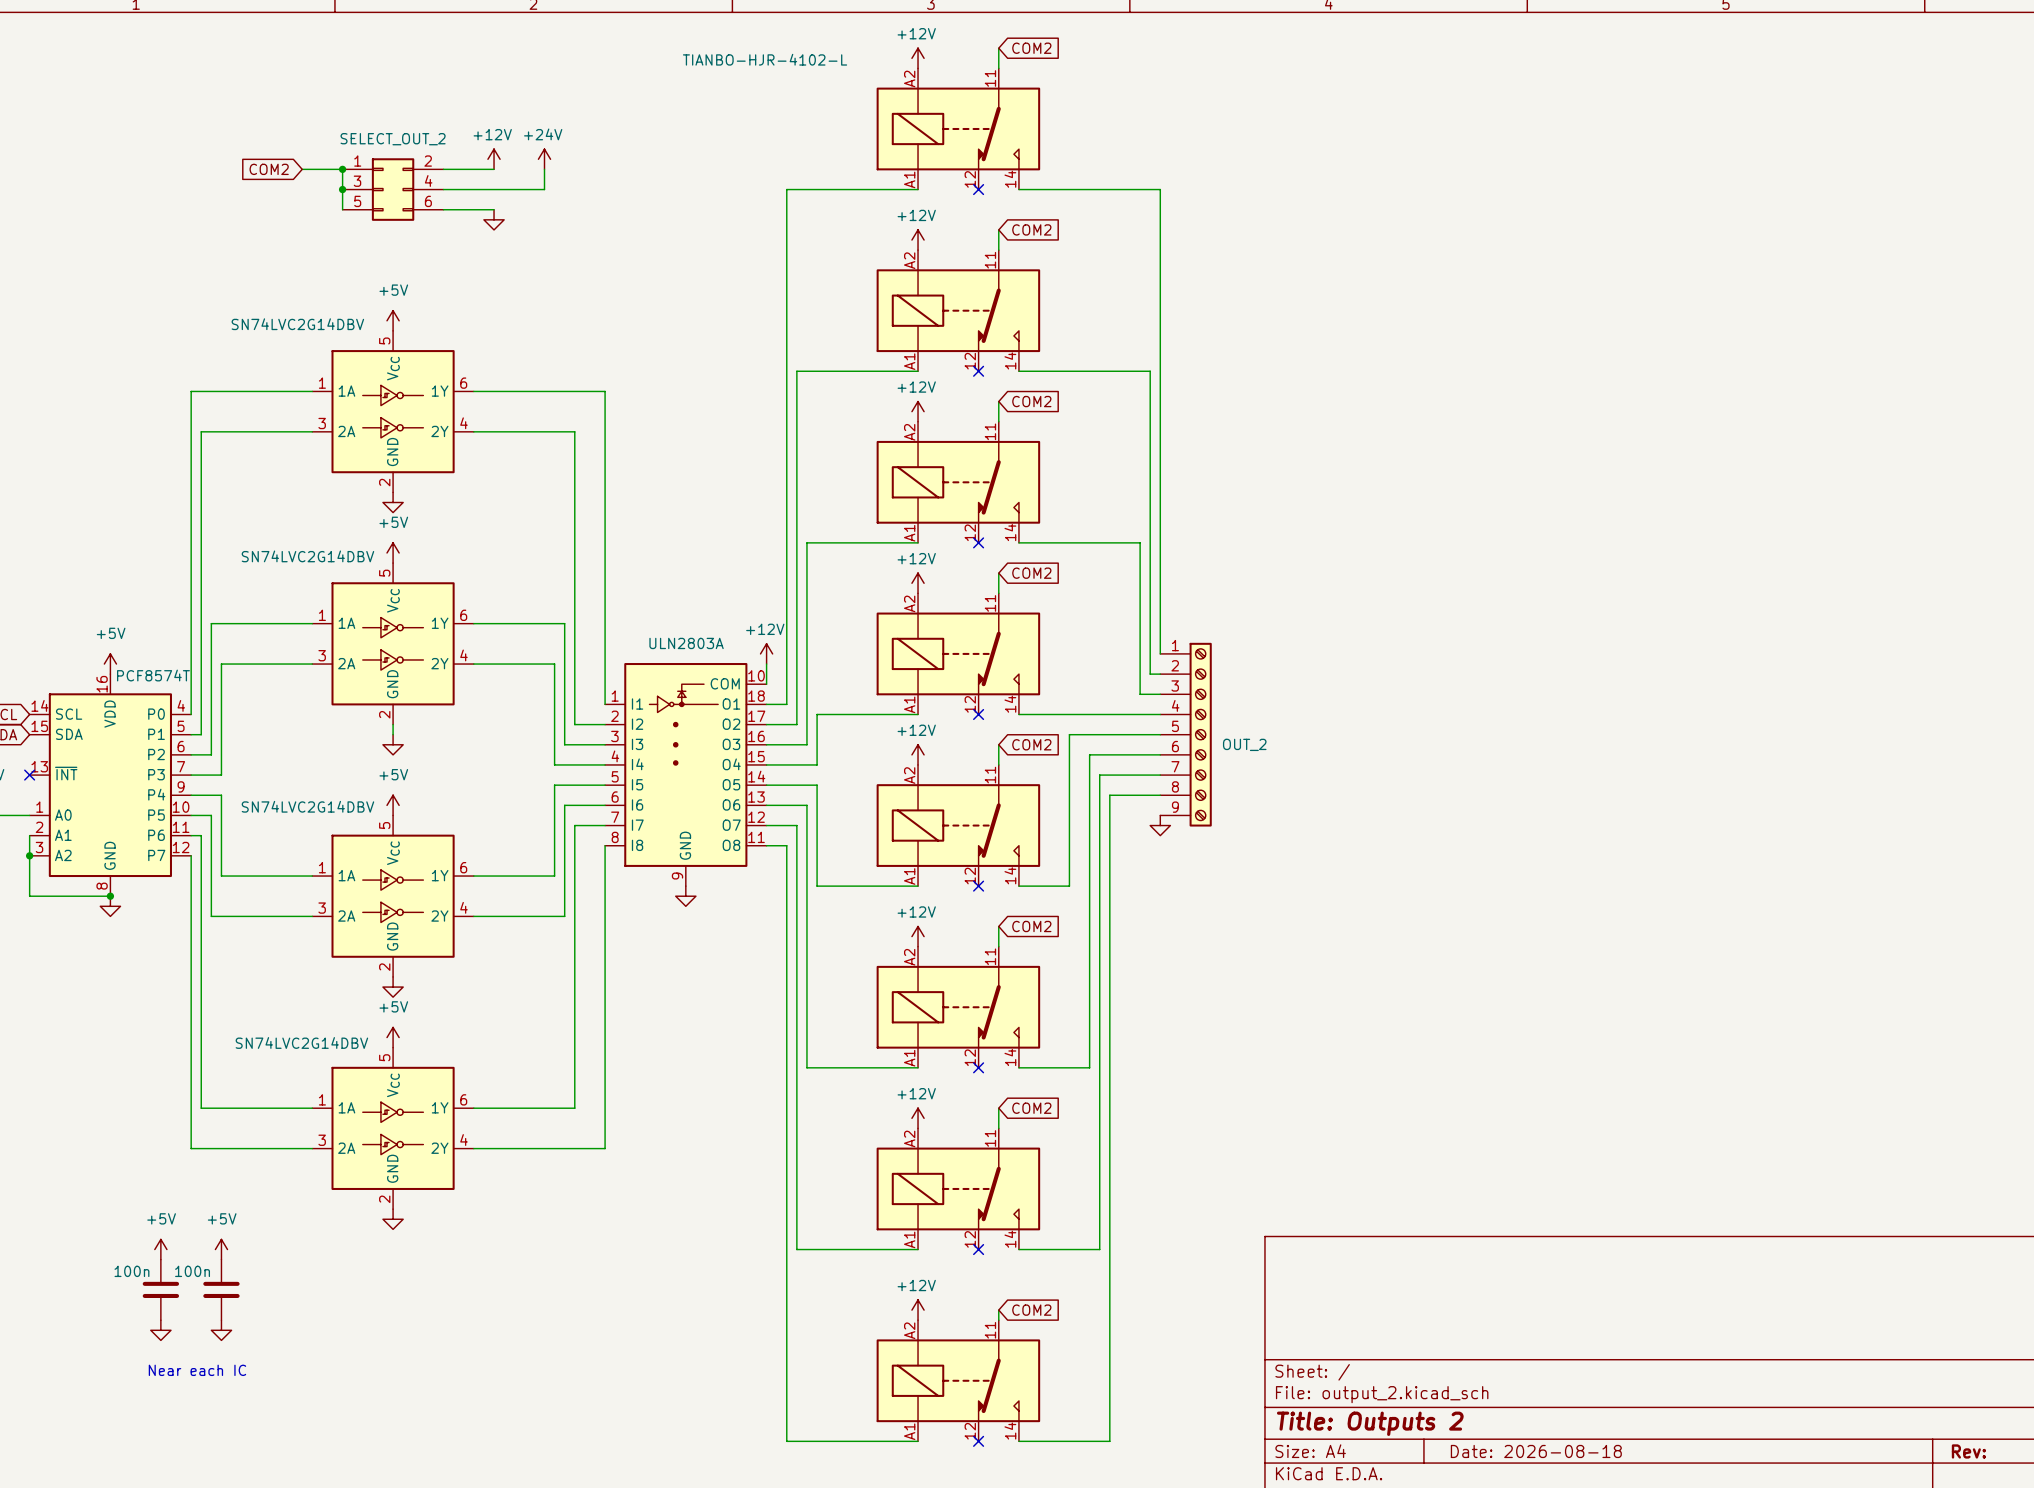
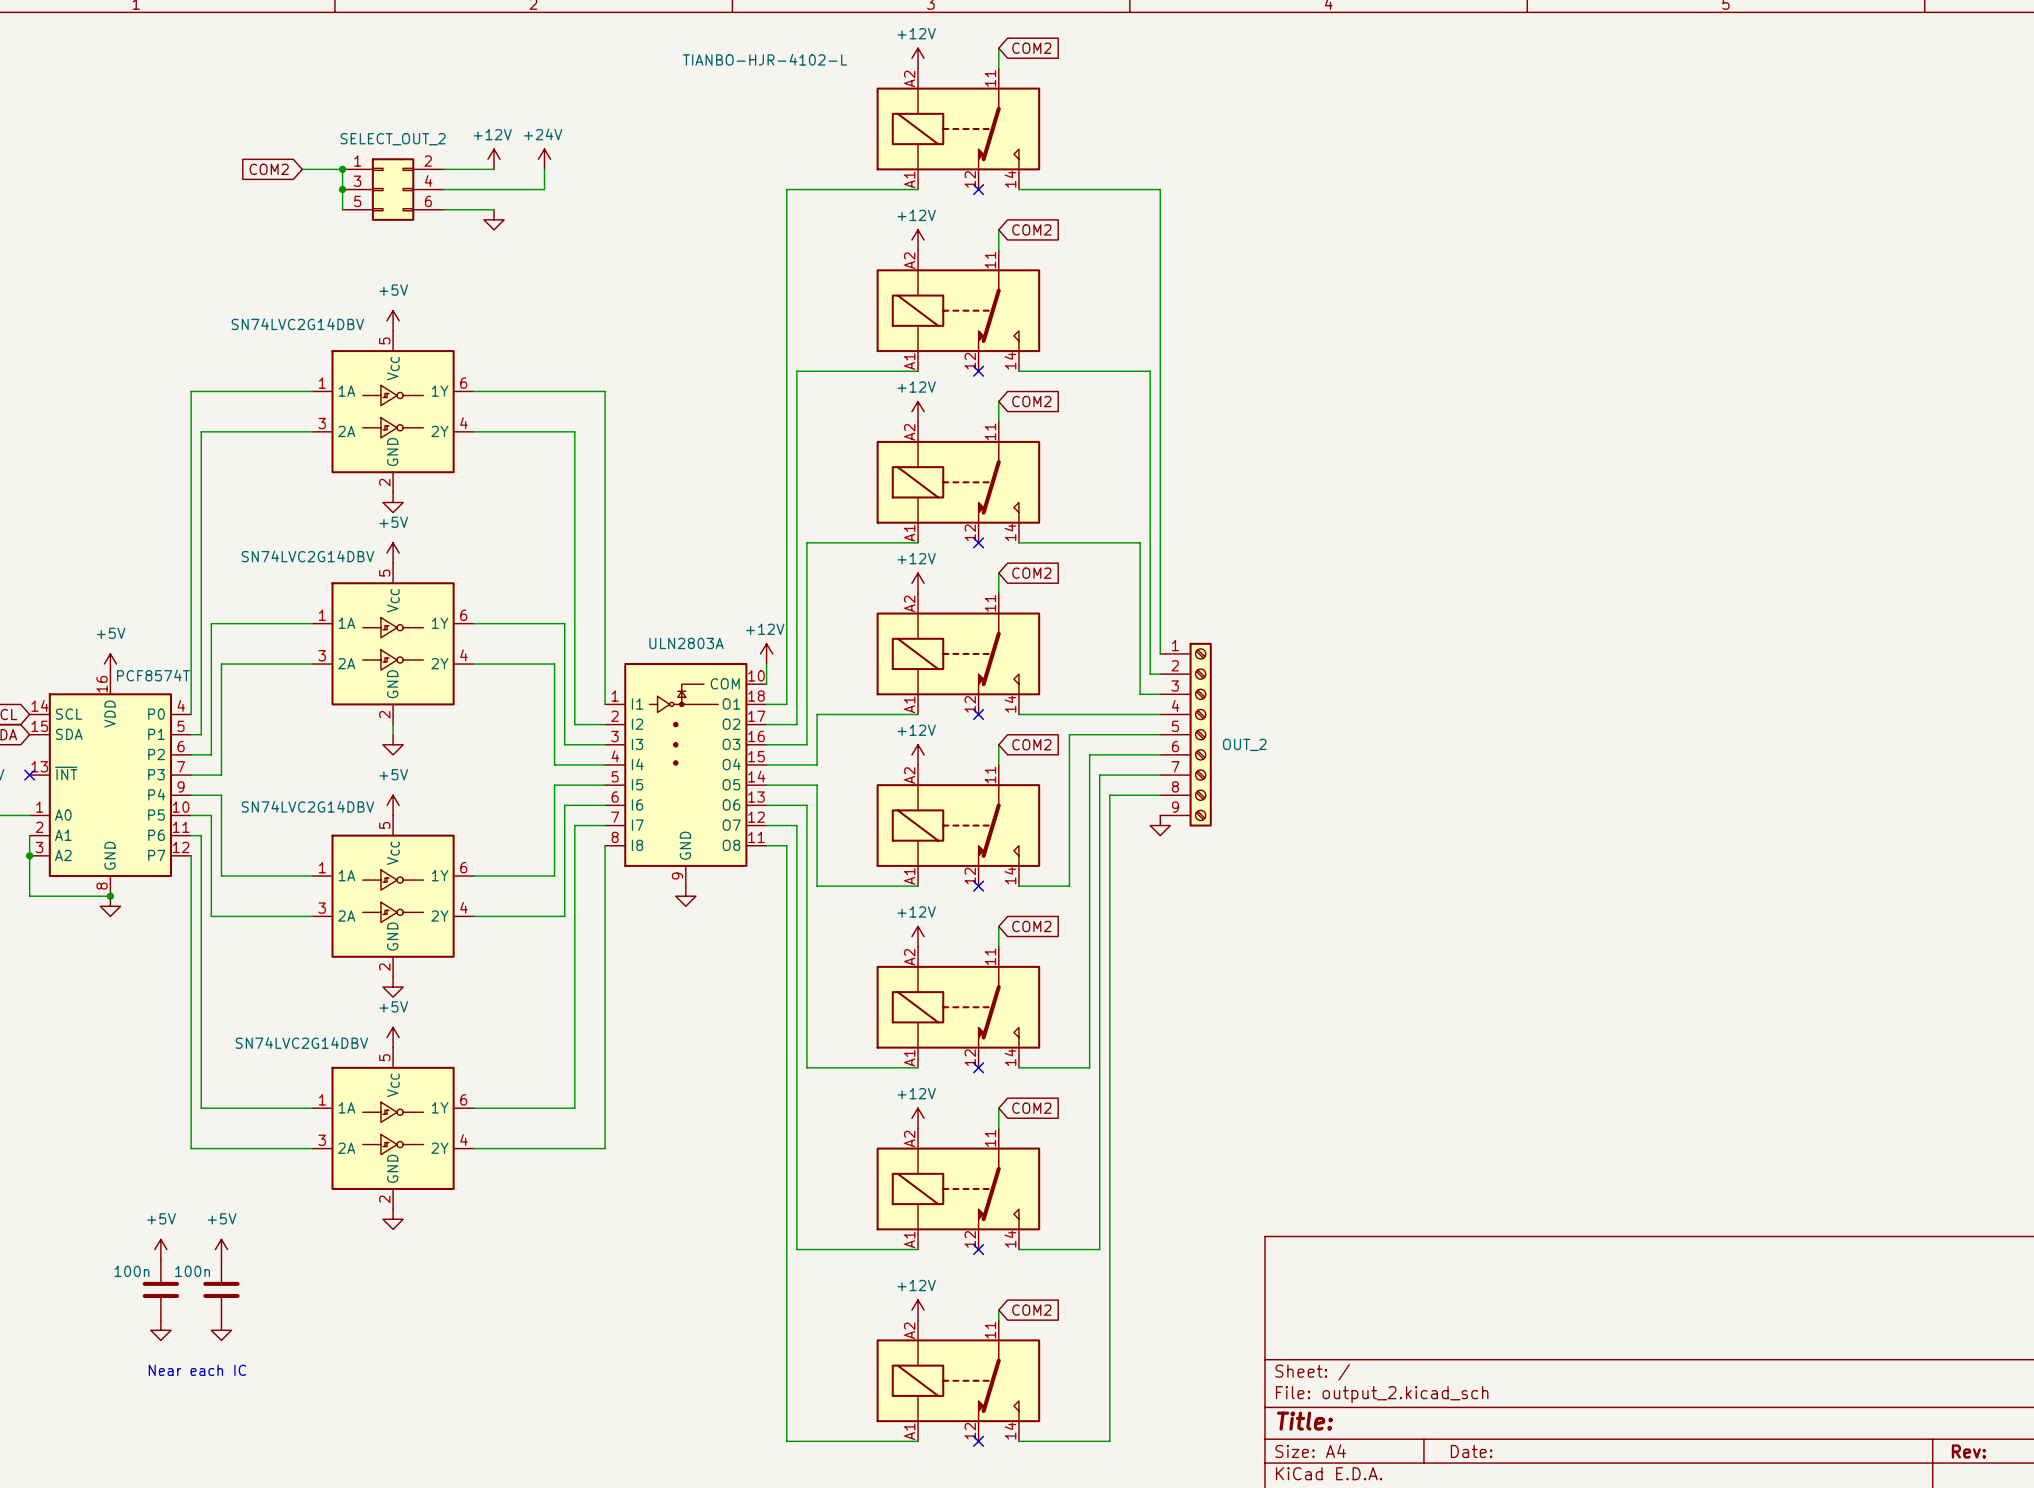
title block: Title: Outputs 2 (1370, 1423) -> Title: (1304, 1421)
title block: Date: 2026-08-18 (1536, 1451) -> Date: (1471, 1451)

